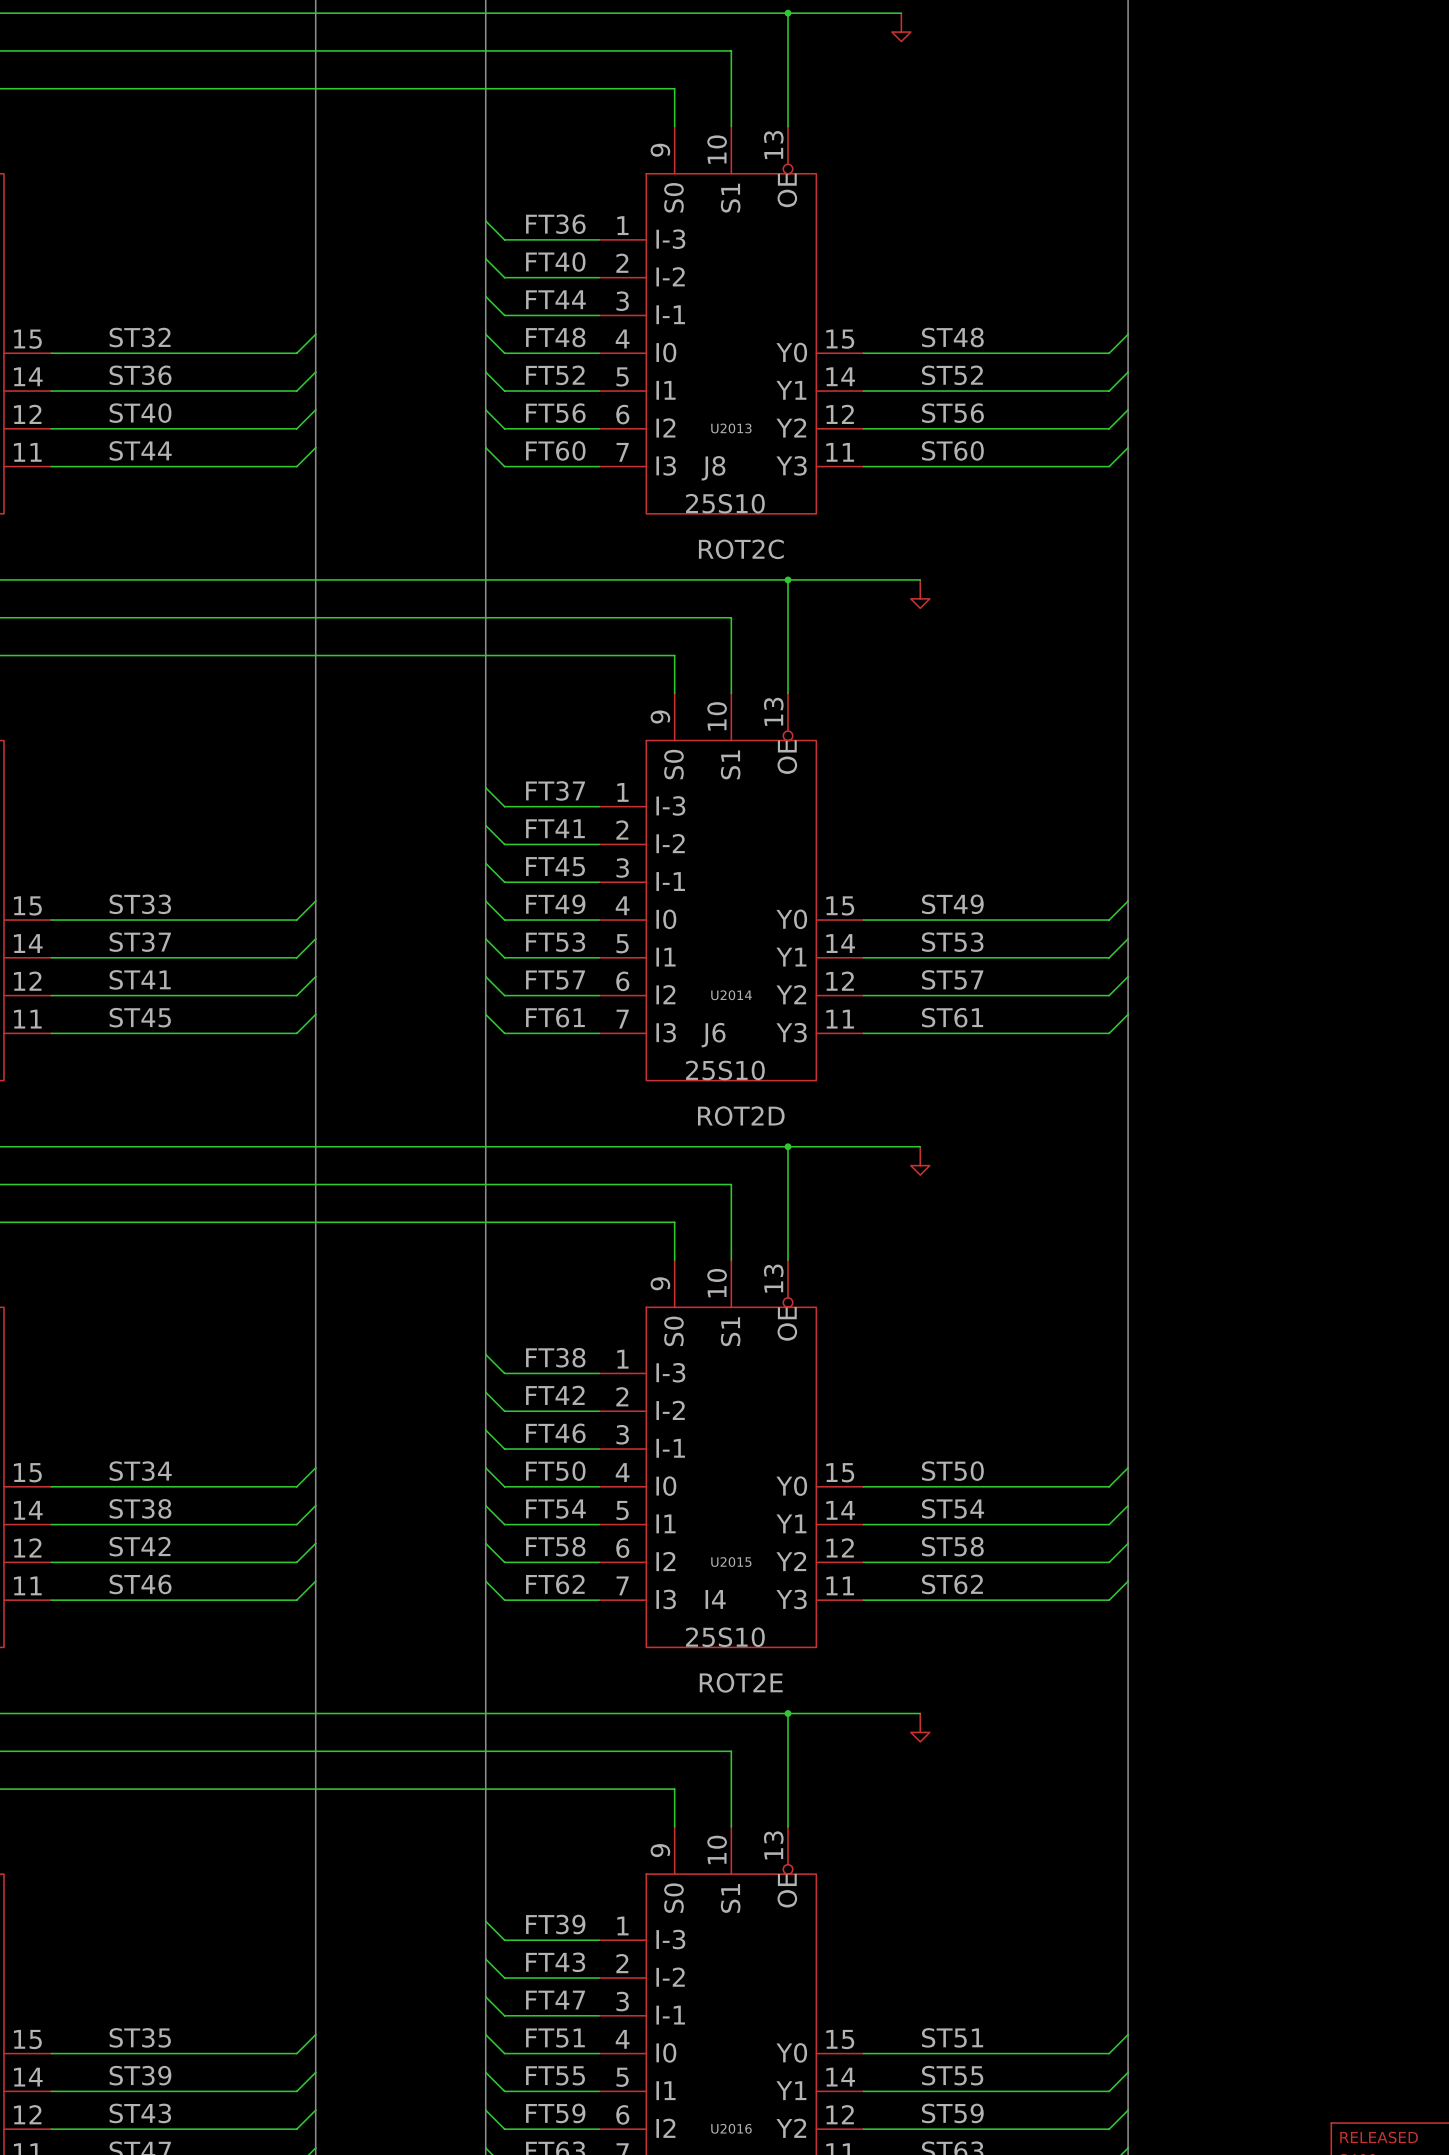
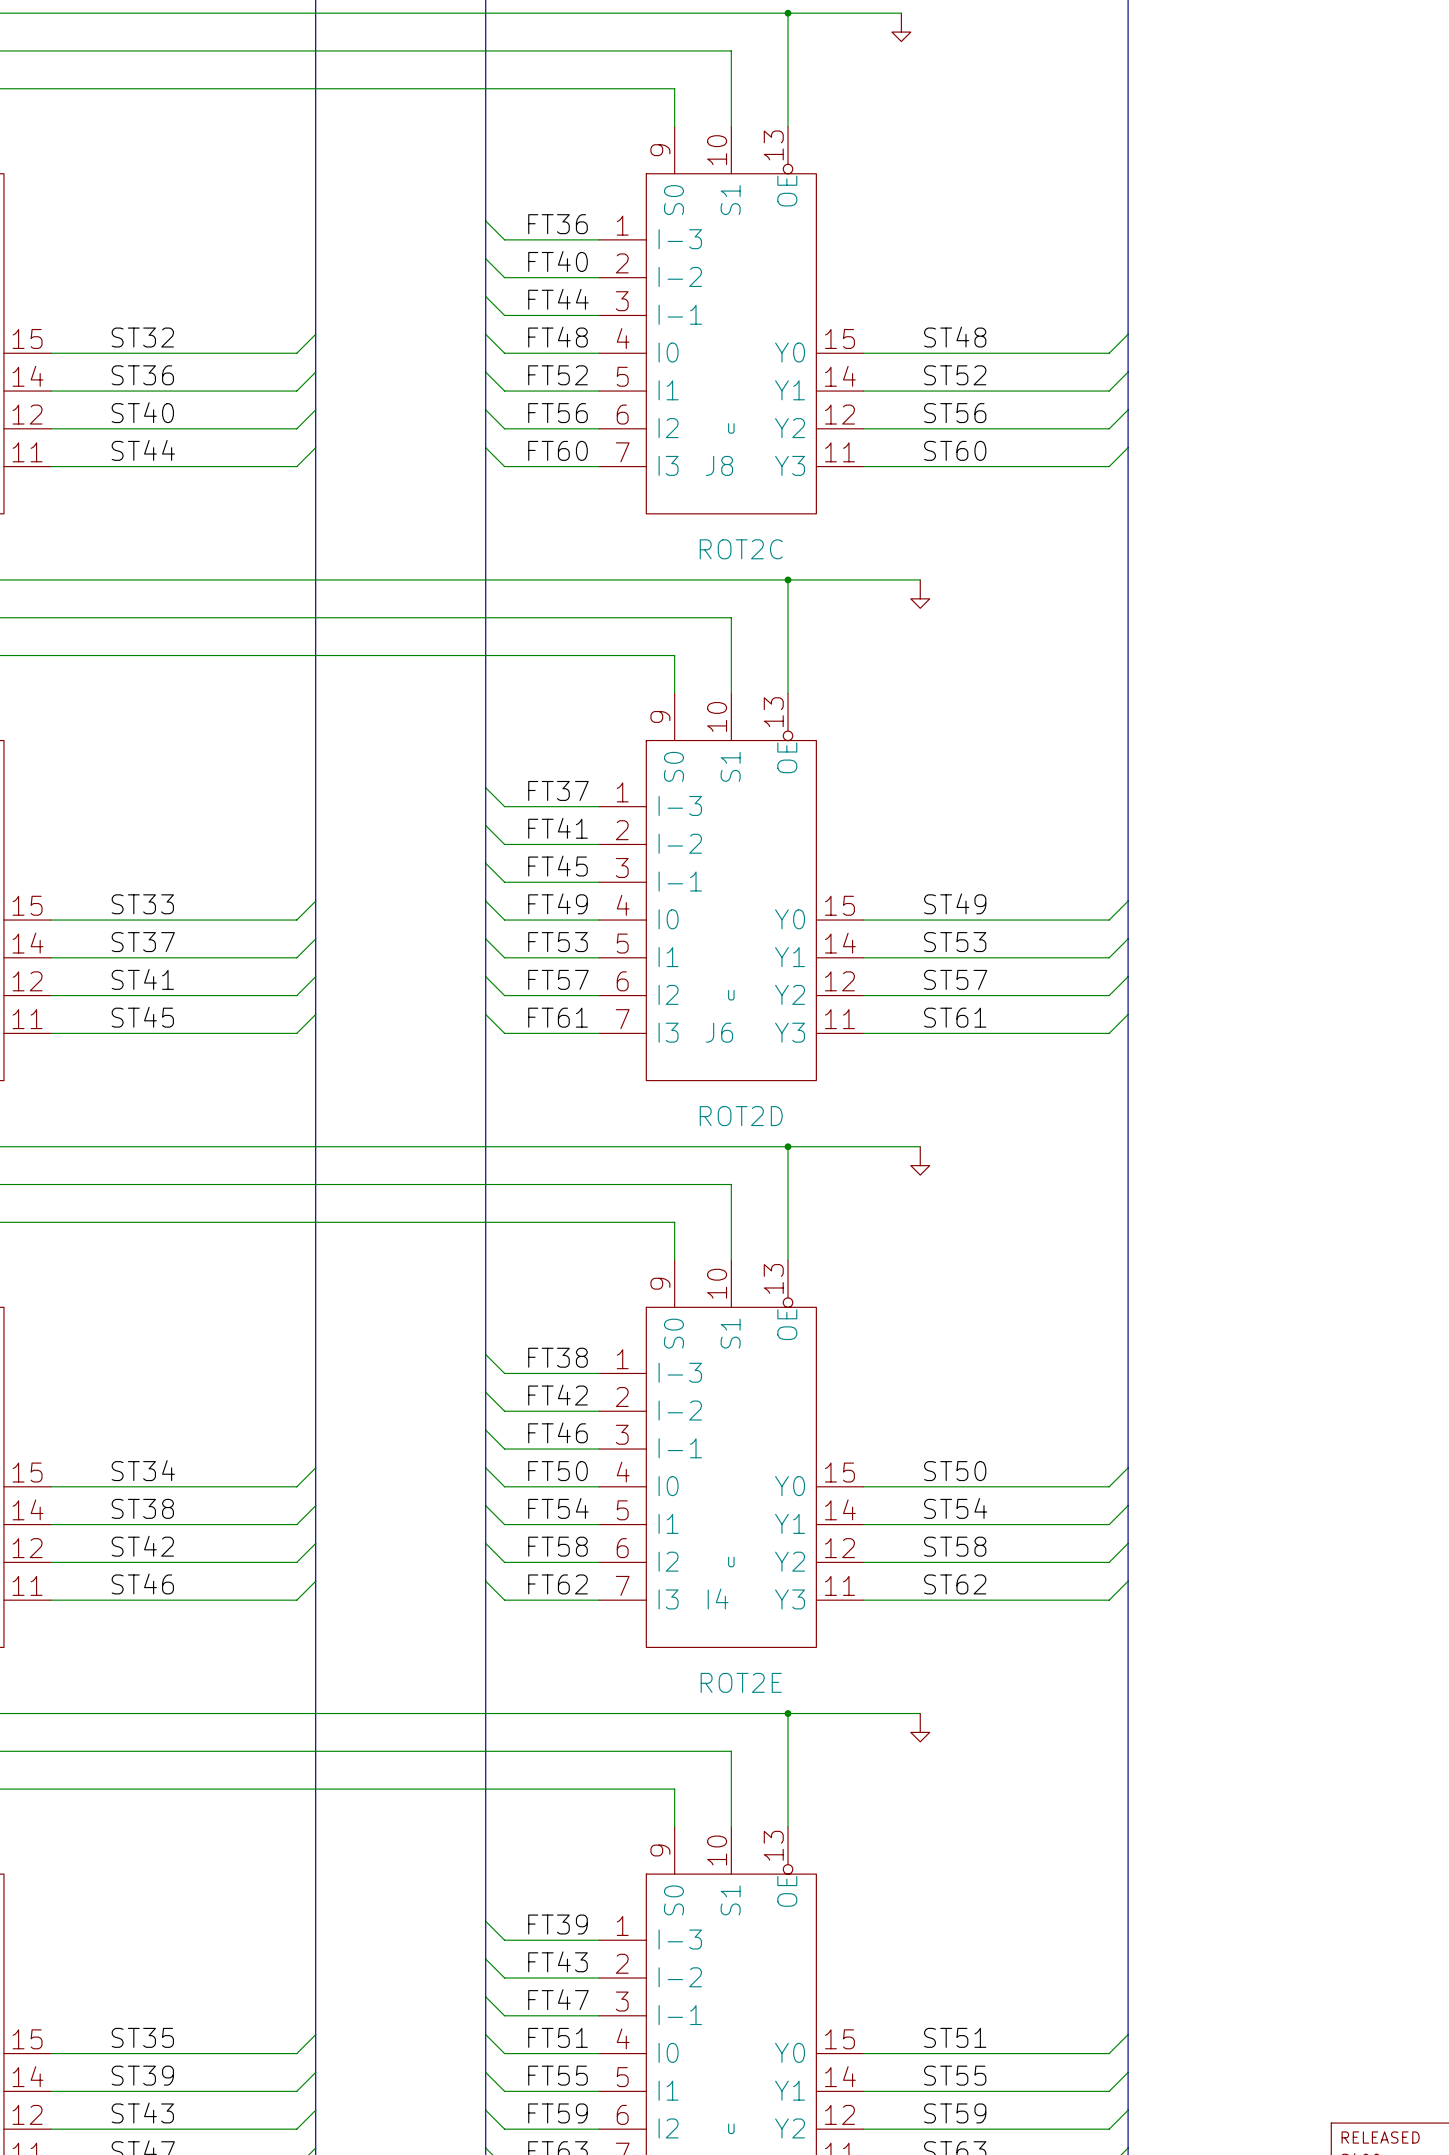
U2013 name: U2013 (731, 428) -> U (731, 428)
U2013 value: 25S10 (725, 503) -> none
U2014 name: U2014 (731, 995) -> U (731, 995)
U2014 value: 25S10 (725, 1070) -> none
U2015 name: U2015 (731, 1562) -> U (731, 1562)
U2015 value: 25S10 (725, 1637) -> none
U2016 name: U2016 (731, 2128) -> U (731, 2128)

